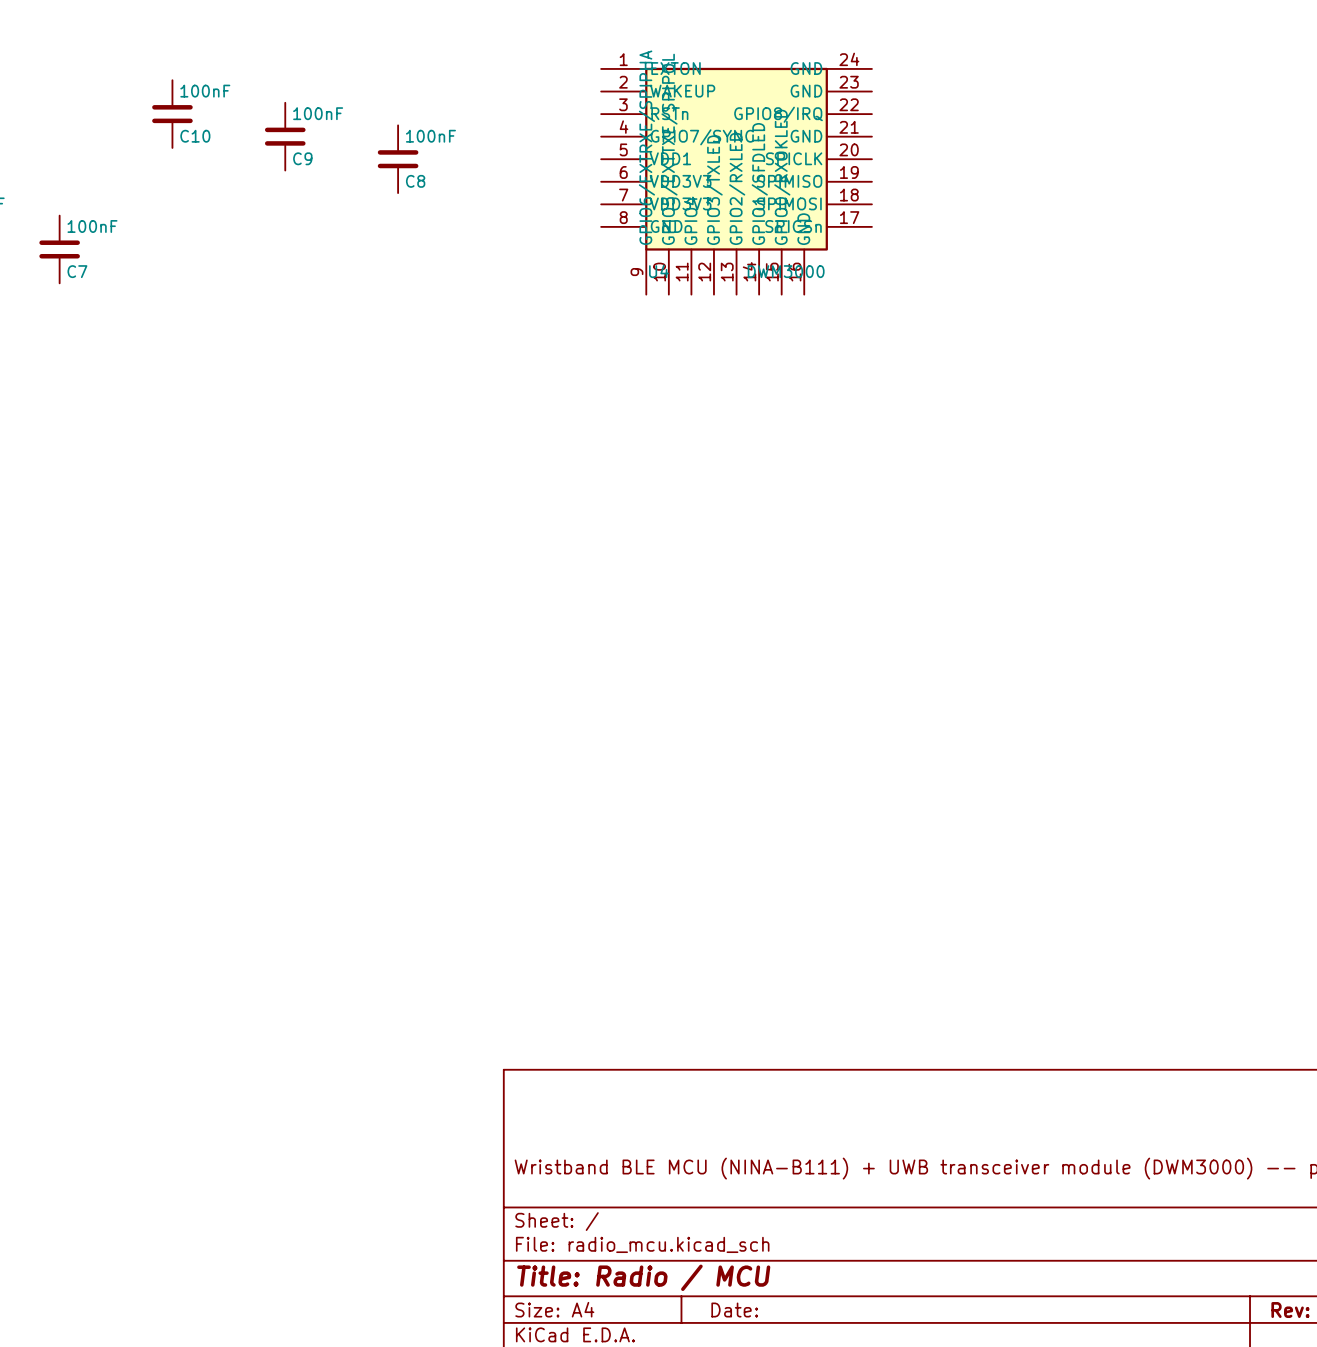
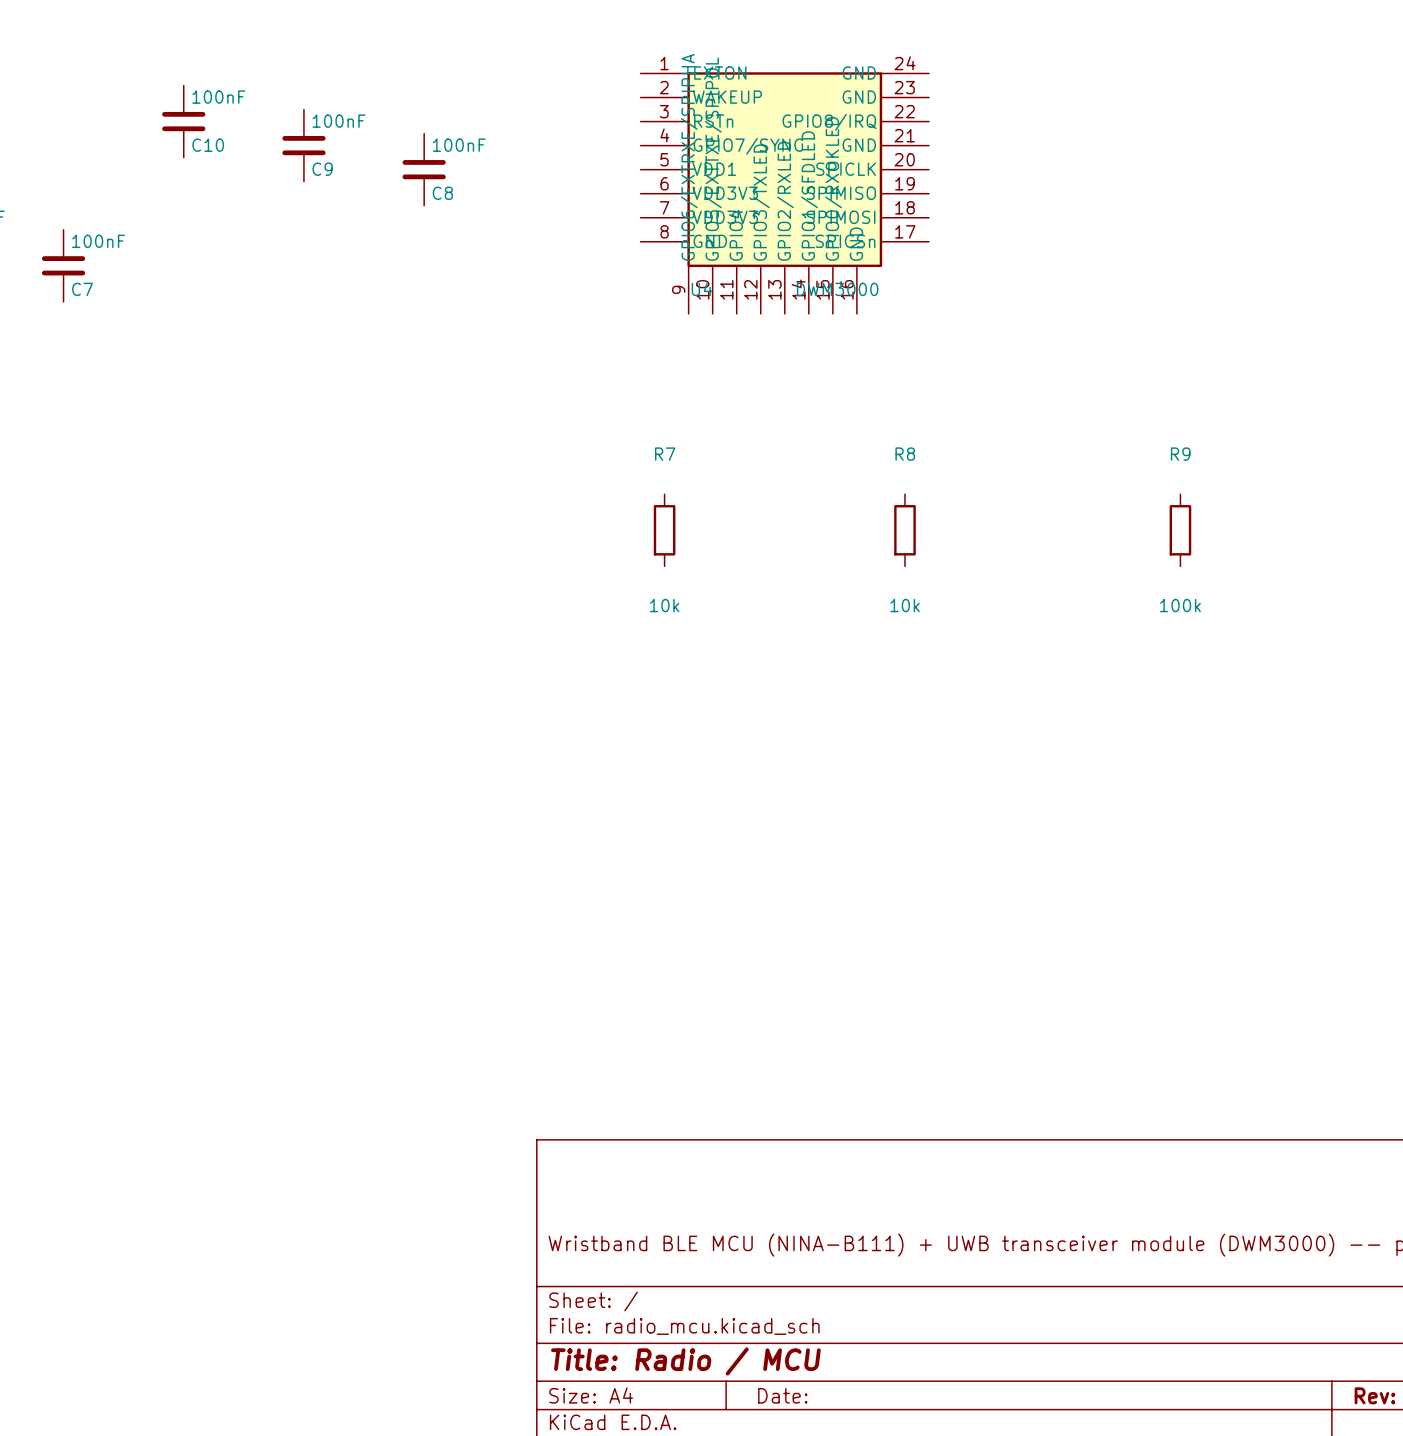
R7: none -> 10k (664, 530)
R8: none -> 10k (904, 530)
R9: none -> 100k (1180, 530)

